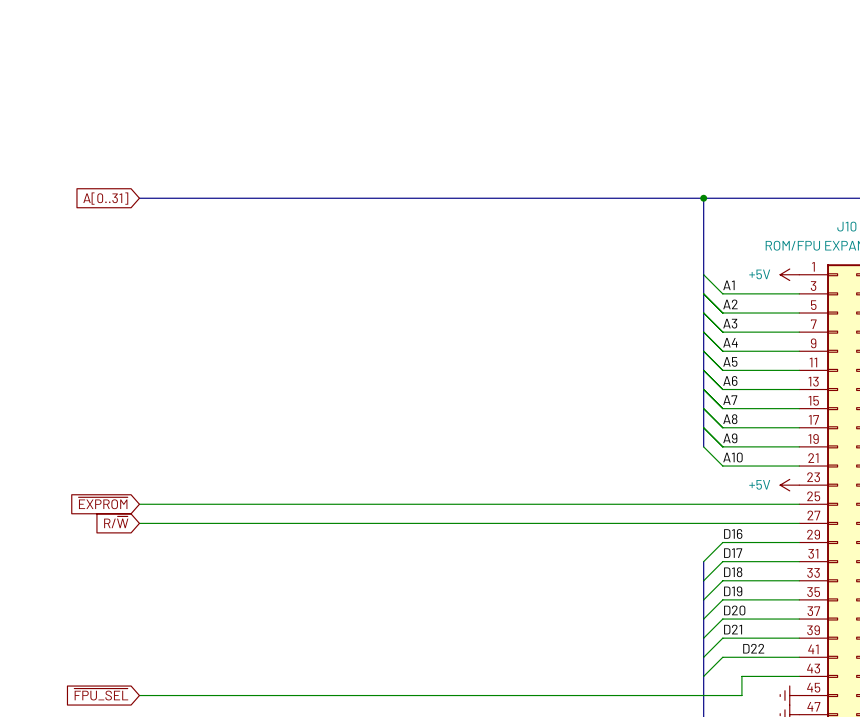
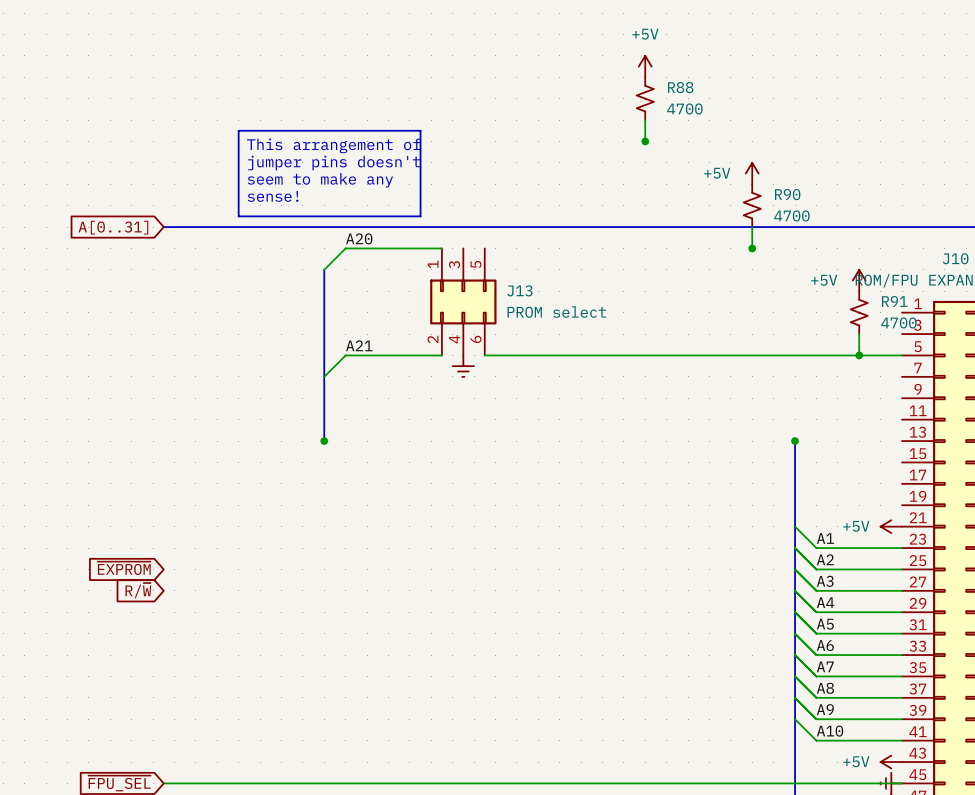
power symbol: none -> +5V (645, 66)
R88: none -> 4700 (645, 98)
wire: none -> (645, 120) (645, 141)
line: none -> (238, 130) (420, 130) (420, 216) (238, 216) (238, 130)
junction: none -> (645, 141)
text: none -> This arrangement of (333, 145)
text: none -> jumper pins doesn't (334, 163)
power symbol: none -> +5V (752, 173)
text: none -> seem to make any (320, 180)
text: none -> sense! (273, 196)
R90: none -> 4700 (752, 205)
wire: none -> (752, 227) (752, 248)
bus: (703, 198) (703, 389) -> none
junction position: (703, 198) -> (752, 248)
label: none -> A20 (359, 238)
wire: none -> (441, 248) (345, 248) (324, 269)
bus: none -> (324, 269) (324, 441)
J13: none -> PROM select (463, 301)
wire: (703, 274) (722, 293) (799, 293) -> none
R91: none -> 4700 (859, 312)
power symbol rotation: 0° (789, 274) -> 90° clockwise (859, 280)
power symbol position: +5V (789, 274) -> +5V (859, 280)
label: A1 (728, 285) -> none
wire: (703, 293) (722, 313) -> (484, 355) (816, 355)
wire: none -> (859, 334) (859, 355)
label: none -> A21 (359, 345)
label: A2 (730, 304) -> none
wire: none -> (441, 355) (345, 355) (324, 376)
wire: (703, 313) (722, 332) (799, 332) -> none
junction: none -> (859, 355)
power symbol: none -> (463, 366)
label: A3 (730, 323) -> none
wire: (703, 332) (722, 351) (799, 351) -> (795, 526) (816, 548) (902, 548)
label: A4 (730, 342) -> none
wire: (703, 351) (722, 370) (799, 370) -> none
label: A5 (730, 361) -> none
wire: (703, 370) (722, 389) (799, 389) -> none
label: A6 (730, 380) -> none
junction: none -> (324, 441)
wire: (703, 389) (722, 408) (799, 408) -> none
junction: none -> (795, 441)
label: A7 (730, 400) -> none
wire: (703, 408) (722, 427) (799, 427) -> none
label: A8 (730, 419) -> none
wire: (703, 427) (722, 446) (799, 446) -> none
label: A9 (730, 438) -> none
wire: (703, 446) (722, 466) (799, 466) -> none
bus: none -> (795, 505) (795, 633)
label: A10 (732, 457) -> A1 (825, 538)
power symbol position: +5V (789, 485) -> +5V (891, 526)
label: none -> A2 (825, 559)
wire: (139, 504) (722, 504) -> (795, 548) (816, 569)
label: none -> A3 (825, 581)
wire: (139, 523) (722, 523) -> (795, 569) (816, 590)
label: D16 (733, 533) -> A4 (825, 602)
wire: (722, 542) (703, 561) -> (816, 612) (795, 590)
label: D17 (733, 553) -> A5 (825, 624)
wire: (722, 561) (703, 580) -> (816, 633) (795, 612)
label: D18 (733, 572) -> A6 (825, 645)
wire: (722, 580) (703, 599) -> (816, 655) (795, 633)
label: D19 (733, 591) -> A7 (825, 666)
wire: (722, 599) (703, 619) -> (816, 676) (795, 655)
label: D20 (734, 610) -> A8 (825, 688)
wire: (722, 619) (703, 638) -> (816, 697) (795, 676)
label: D21 (733, 629) -> A9 (825, 709)
wire: (722, 638) (703, 657) -> (816, 719) (795, 697)
label: none -> A10 (830, 731)
label: D22 (753, 648) -> none
wire: (722, 657) (703, 676) -> (816, 740) (795, 719)
power symbol: none -> +5V (891, 762)
wire: (799, 676) (741, 676) (741, 695) -> (902, 783) (837, 783)

